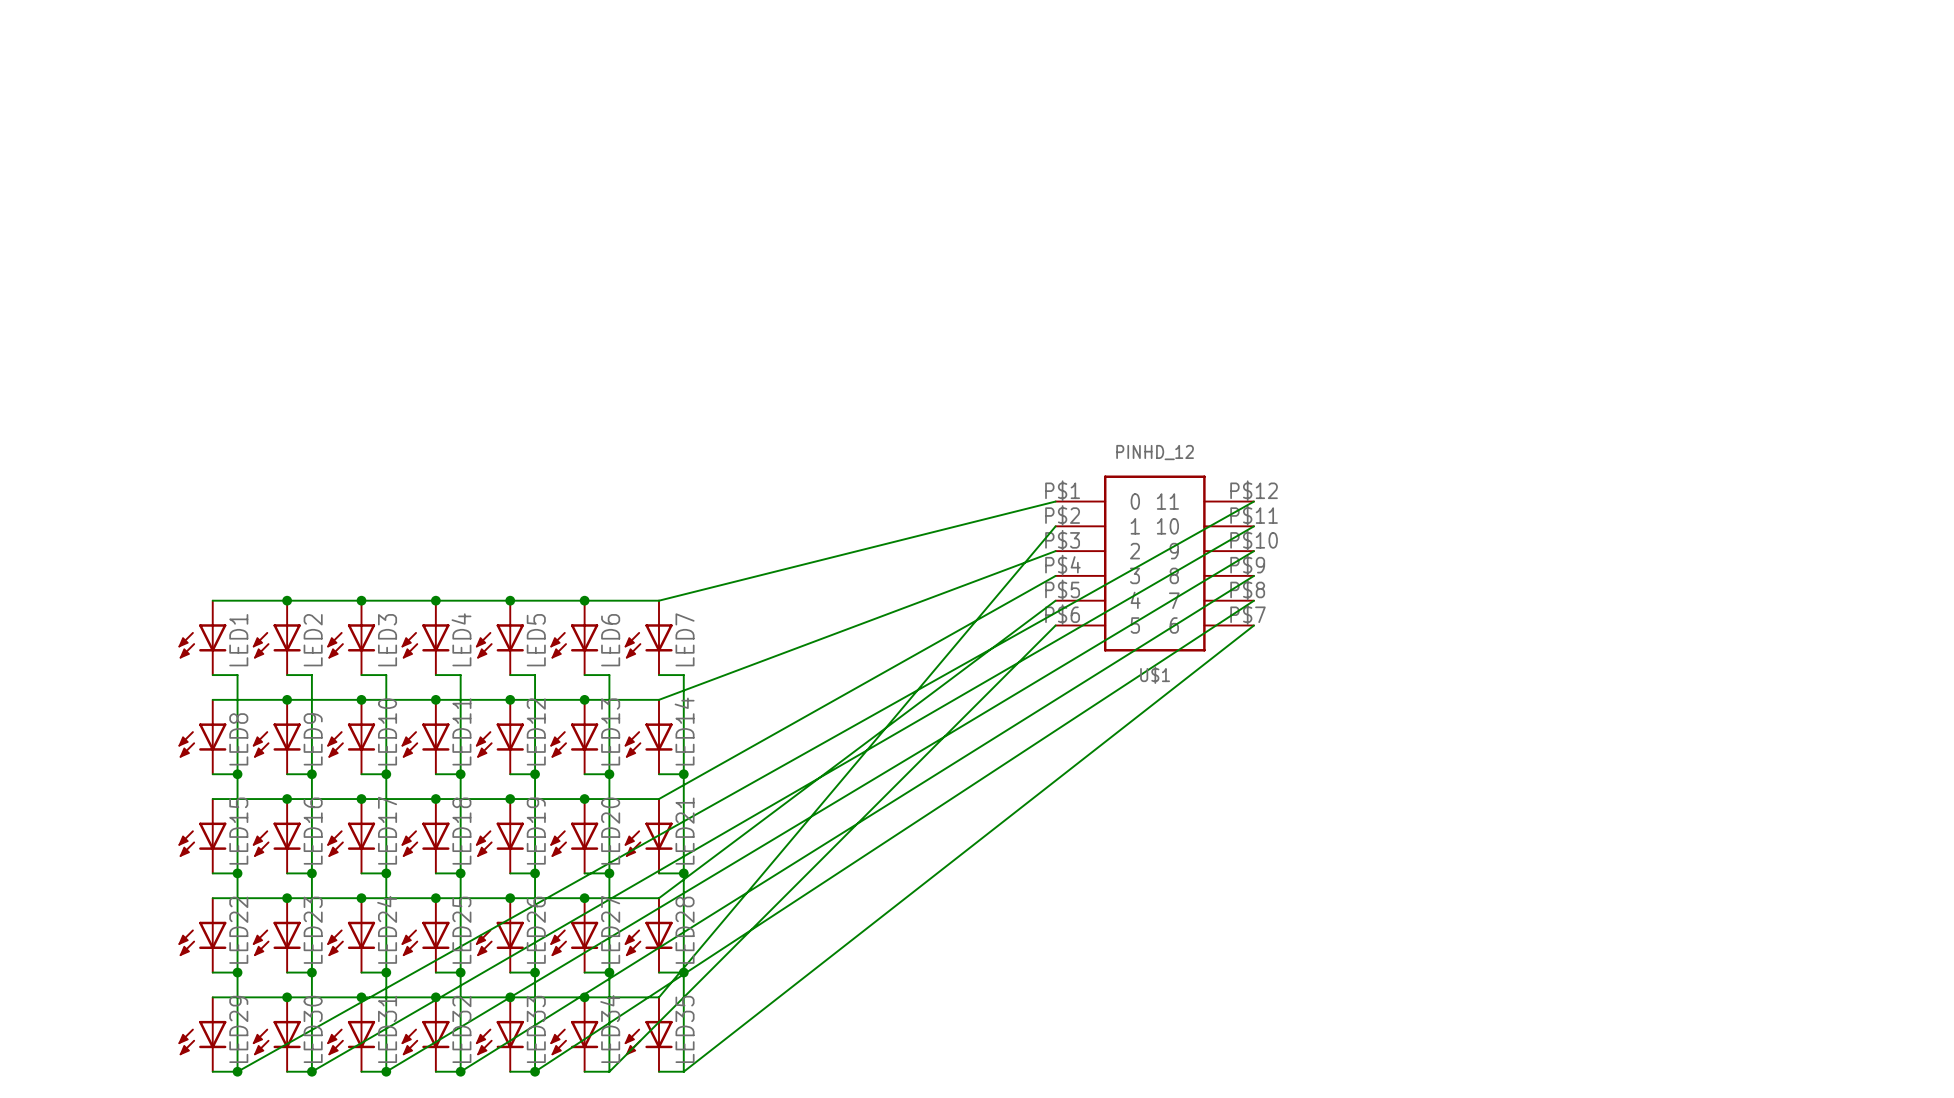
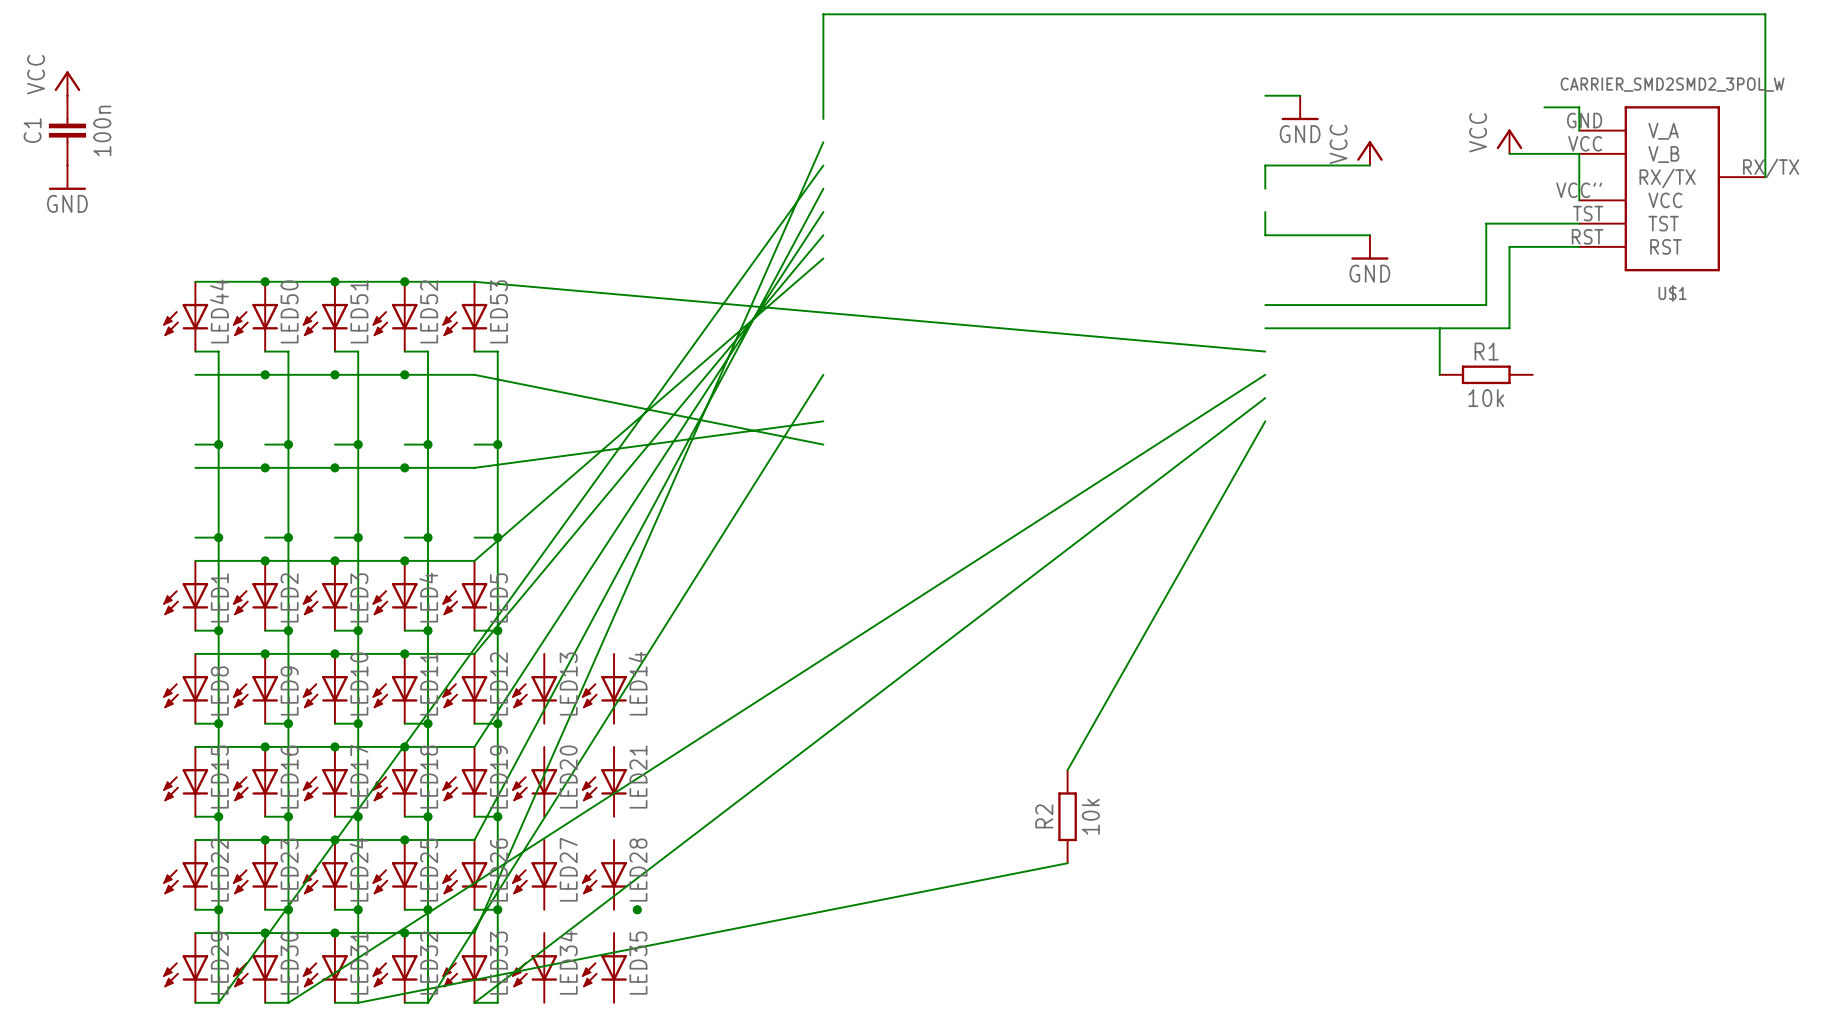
power symbol: none -> VCC (67, 83)
wire: none -> (1265, 95) (1300, 95)
power symbol: none -> GND (1300, 107)
wire: none -> (1544, 107) (1579, 107) (1579, 130)
wire: none -> (823, 118) (823, 14) (1765, 14) (1765, 177)
C1: none -> 100n (67, 130)
power symbol: none -> VCC (1509, 141)
power symbol: none -> VCC (1369, 153)
wire: none -> (1509, 153) (1579, 153) (1579, 200)
wire: none -> (1369, 165) (1265, 165) (1265, 188)
power symbol: none -> GND (67, 177)
wire: none -> (1265, 212) (1265, 235) (1369, 235)
wire: none -> (1579, 223) (1486, 223) (1486, 305) (1265, 305)
power symbol: none -> GND (1369, 247)
wire: none -> (1579, 246) (1509, 246) (1509, 328) (1265, 328)
wire: none -> (195, 281) (474, 281) (1265, 351)
junction: none -> (265, 281)
junction: none -> (334, 281)
junction: none -> (404, 281)
LED44: none -> (185, 316)
LED50: none -> (255, 316)
LED51: none -> (325, 316)
LED52: none -> (395, 316)
LED53: none -> (464, 316)
wire: none -> (1439, 328) (1439, 374)
wire: none -> (195, 351) (218, 351) (218, 630)
wire: none -> (265, 351) (288, 351) (288, 630)
wire: none -> (334, 351) (358, 351) (358, 630)
wire: none -> (404, 351) (427, 351) (427, 630)
wire: none -> (474, 351) (497, 351) (497, 630)
wire: none -> (195, 374) (474, 374) (823, 444)
junction: none -> (265, 374)
junction: none -> (334, 374)
junction: none -> (404, 374)
R1: none -> 10k (1486, 374)
wire: none -> (1265, 398) (474, 1002)
wire: none -> (823, 421) (474, 467) (195, 467)
wire: none -> (1265, 421) (1067, 770)
U$1 value: PINHD_12 (1155, 452) -> CARRIER_SMD2SMD2_3POL_W (1672, 84)
U$1 symbol: [1055, 475, 1254, 652] -> [1579, 106, 1766, 272]
wire: none -> (195, 444) (218, 444)
junction: none -> (218, 444)
wire: none -> (265, 444) (288, 444)
junction: none -> (288, 444)
wire: none -> (334, 444) (358, 444)
junction: none -> (358, 444)
wire: none -> (404, 444) (427, 444)
junction: none -> (427, 444)
wire: none -> (474, 444) (497, 444)
junction: none -> (497, 444)
junction: none -> (265, 467)
junction: none -> (334, 467)
junction: none -> (404, 467)
wire: (1055, 501) (658, 600) (510, 600) -> (823, 258) (474, 560)
wire: (1253, 501) (237, 1071) -> (823, 165) (218, 1002)
wire: (1055, 526) (658, 997) (510, 997) -> (823, 142) (474, 933)
wire: (1253, 526) (311, 1071) -> (1265, 374) (288, 1002)
wire: (1055, 551) (658, 699) (510, 699) -> (823, 235) (474, 653)
wire: (1253, 551) (386, 1071) -> (1067, 863) (358, 1002)
wire: none -> (195, 537) (218, 537)
junction: none -> (218, 537)
wire: none -> (265, 537) (288, 537)
junction: none -> (288, 537)
wire: none -> (334, 537) (358, 537)
junction: none -> (358, 537)
wire: none -> (404, 537) (427, 537)
junction: none -> (427, 537)
junction: none -> (497, 537)
wire: (1055, 575) (658, 799) (510, 799) -> (823, 212) (474, 746)
wire: (1253, 575) (460, 1071) -> (823, 374) (427, 1002)
junction: (510, 600) -> none
junction: (584, 600) -> none
wire: (1055, 600) (658, 898) (510, 898) -> (823, 188) (474, 839)
wire: (1253, 600) (535, 1071) -> none
wire: (1055, 625) (609, 1071) -> none
wire: (1253, 625) (683, 1071) -> none
LED6: (574, 637) -> none
LED7: (648, 637) -> none
junction: none -> (218, 630)
junction: none -> (288, 630)
junction: none -> (358, 630)
junction: none -> (427, 630)
junction: none -> (497, 630)
wire: (584, 675) (609, 675) (609, 1071) -> none
wire: (658, 675) (683, 675) (683, 1071) -> none
junction: (510, 699) -> none
junction: (584, 699) -> none
wire: (584, 774) (609, 774) -> (474, 537) (497, 537)
junction: (609, 774) -> none
wire: (658, 774) (683, 774) -> none
junction: (683, 774) -> none
junction: (510, 799) -> none
junction: (584, 799) -> none
wire: (584, 873) (609, 873) -> none
junction: (609, 873) -> none
wire: (658, 873) (683, 873) -> none
junction: (683, 873) -> none
R2: none -> 10k (1067, 816)
junction: (510, 898) -> none
junction: (584, 898) -> none
wire: (584, 972) (609, 972) -> none
junction: (609, 972) -> none
wire: (658, 972) (683, 972) -> none
junction: (510, 997) -> none
junction: (584, 997) -> none
junction: (237, 1071) -> none
junction: (311, 1071) -> none
junction: (386, 1071) -> none
junction: (460, 1071) -> none
junction: (535, 1071) -> none
wire: (584, 1071) (609, 1071) -> none
wire: (658, 1071) (683, 1071) -> none

